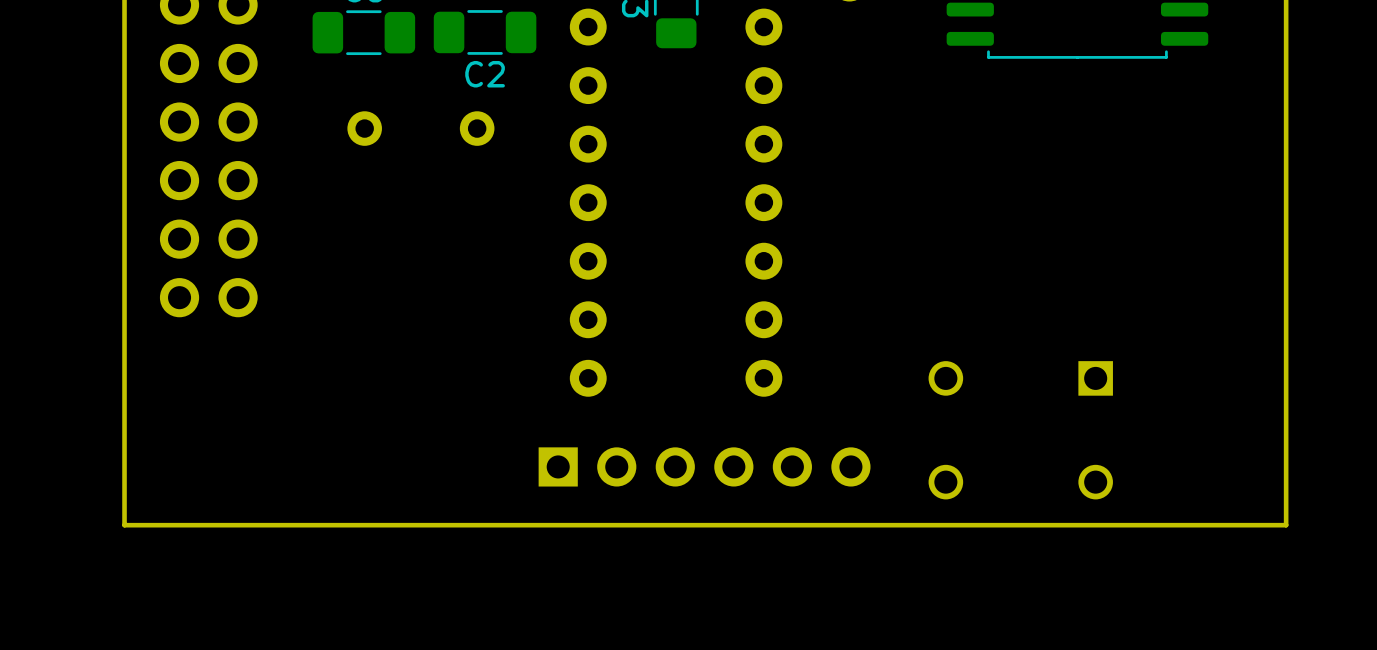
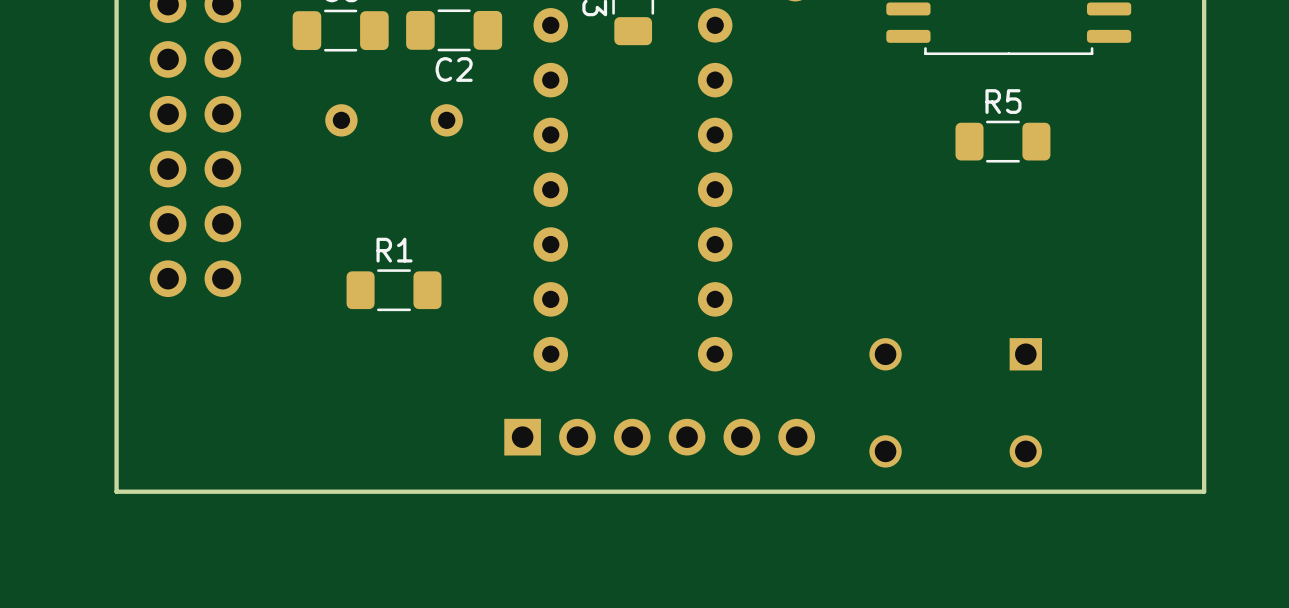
R5: none -> (1002, 141)
R1: none -> (394, 290)

